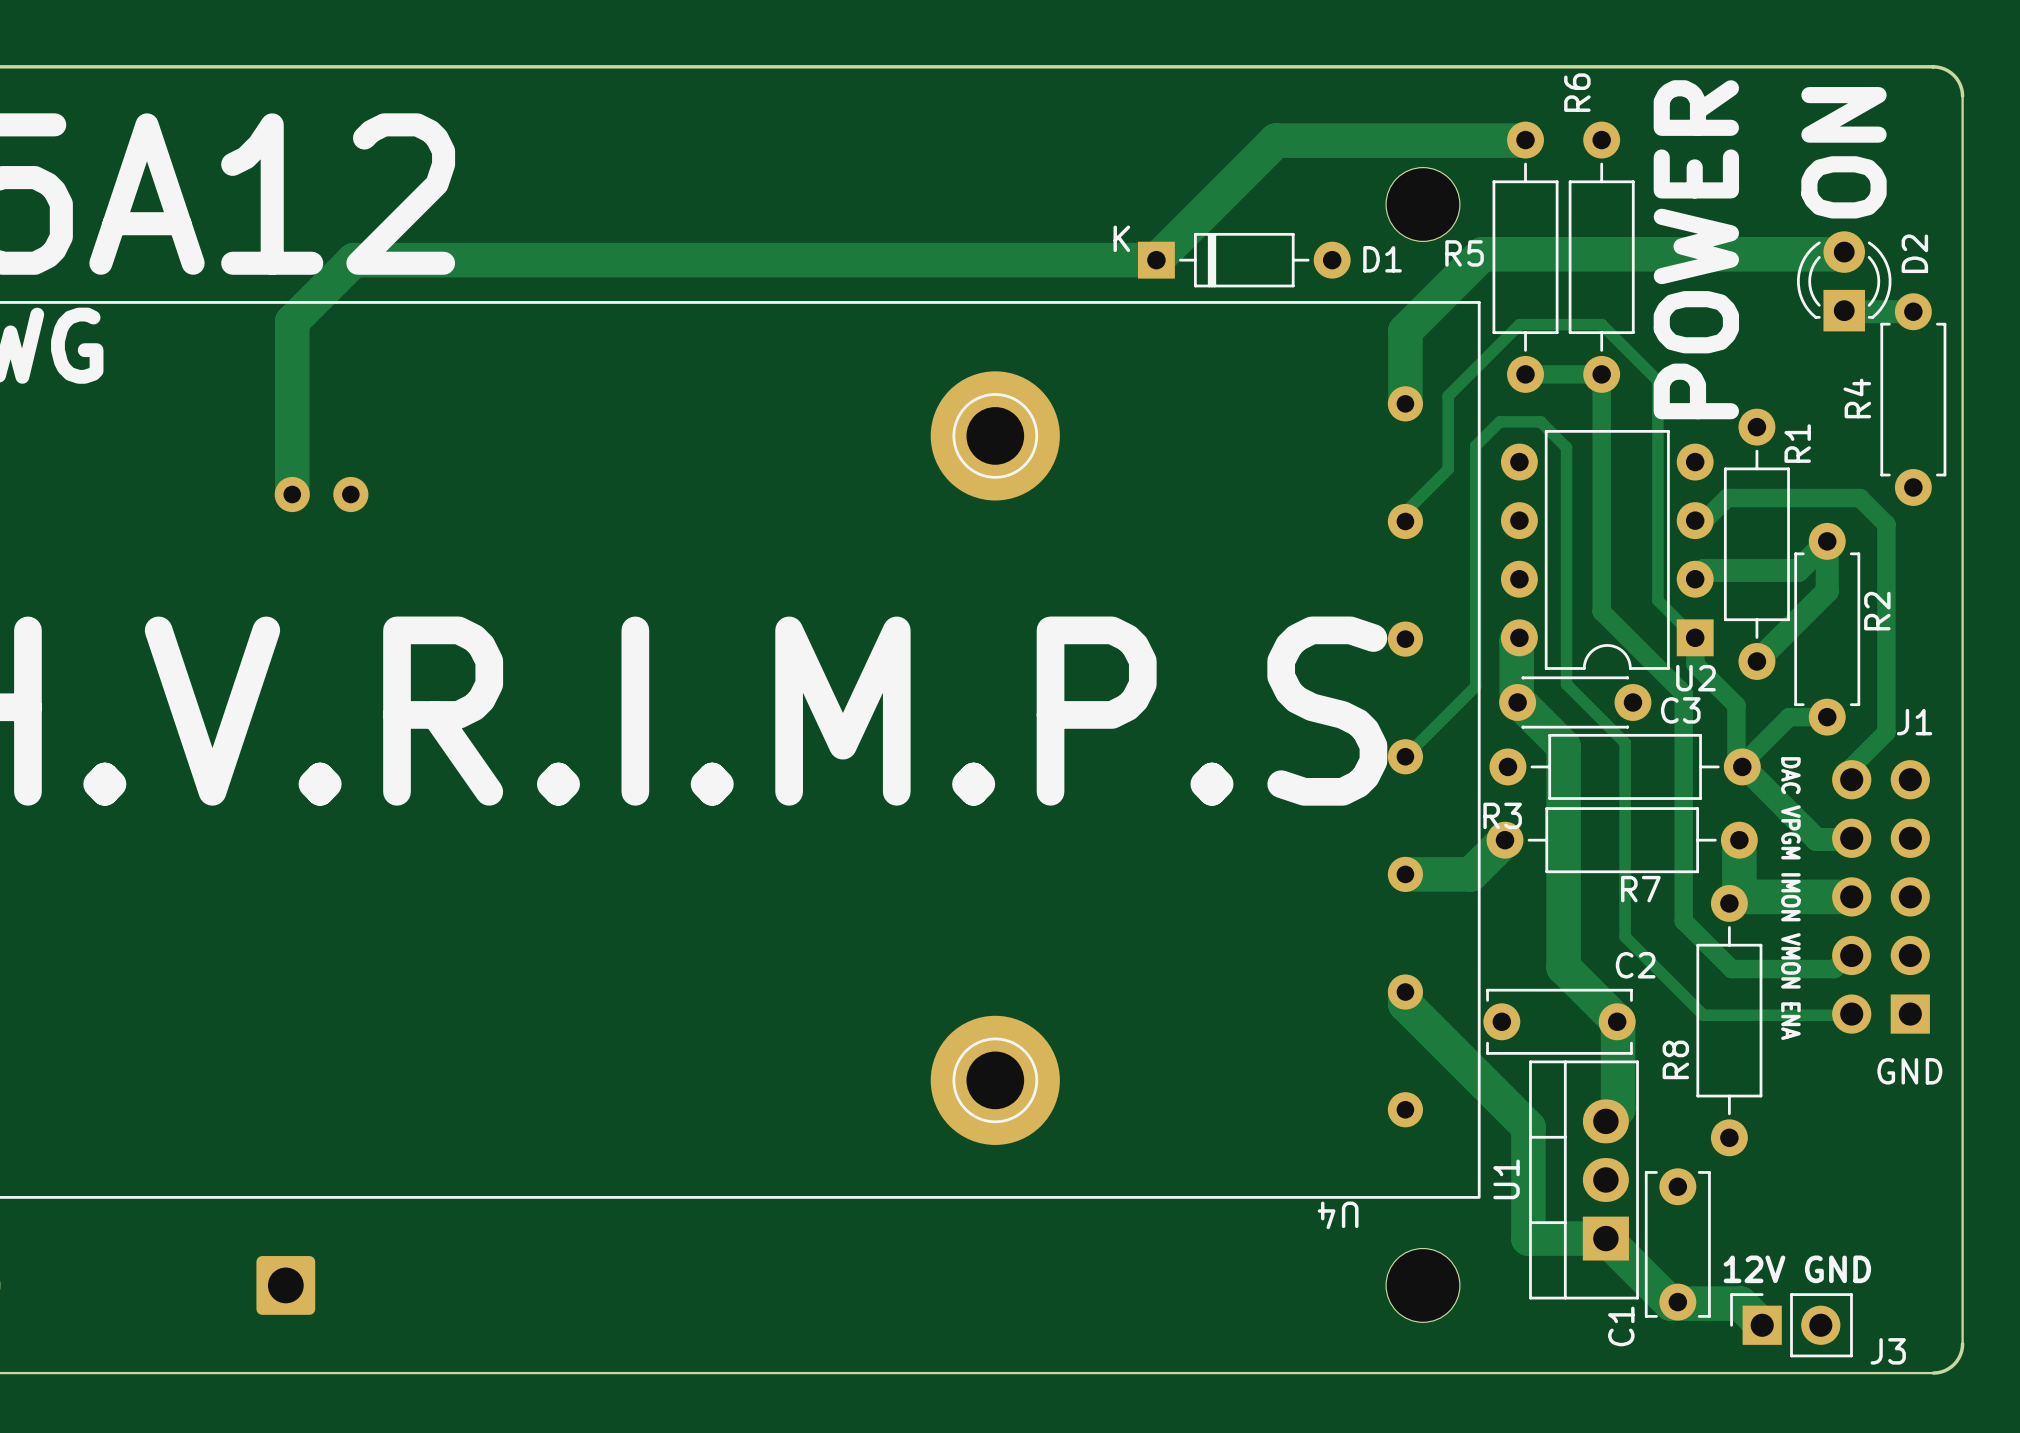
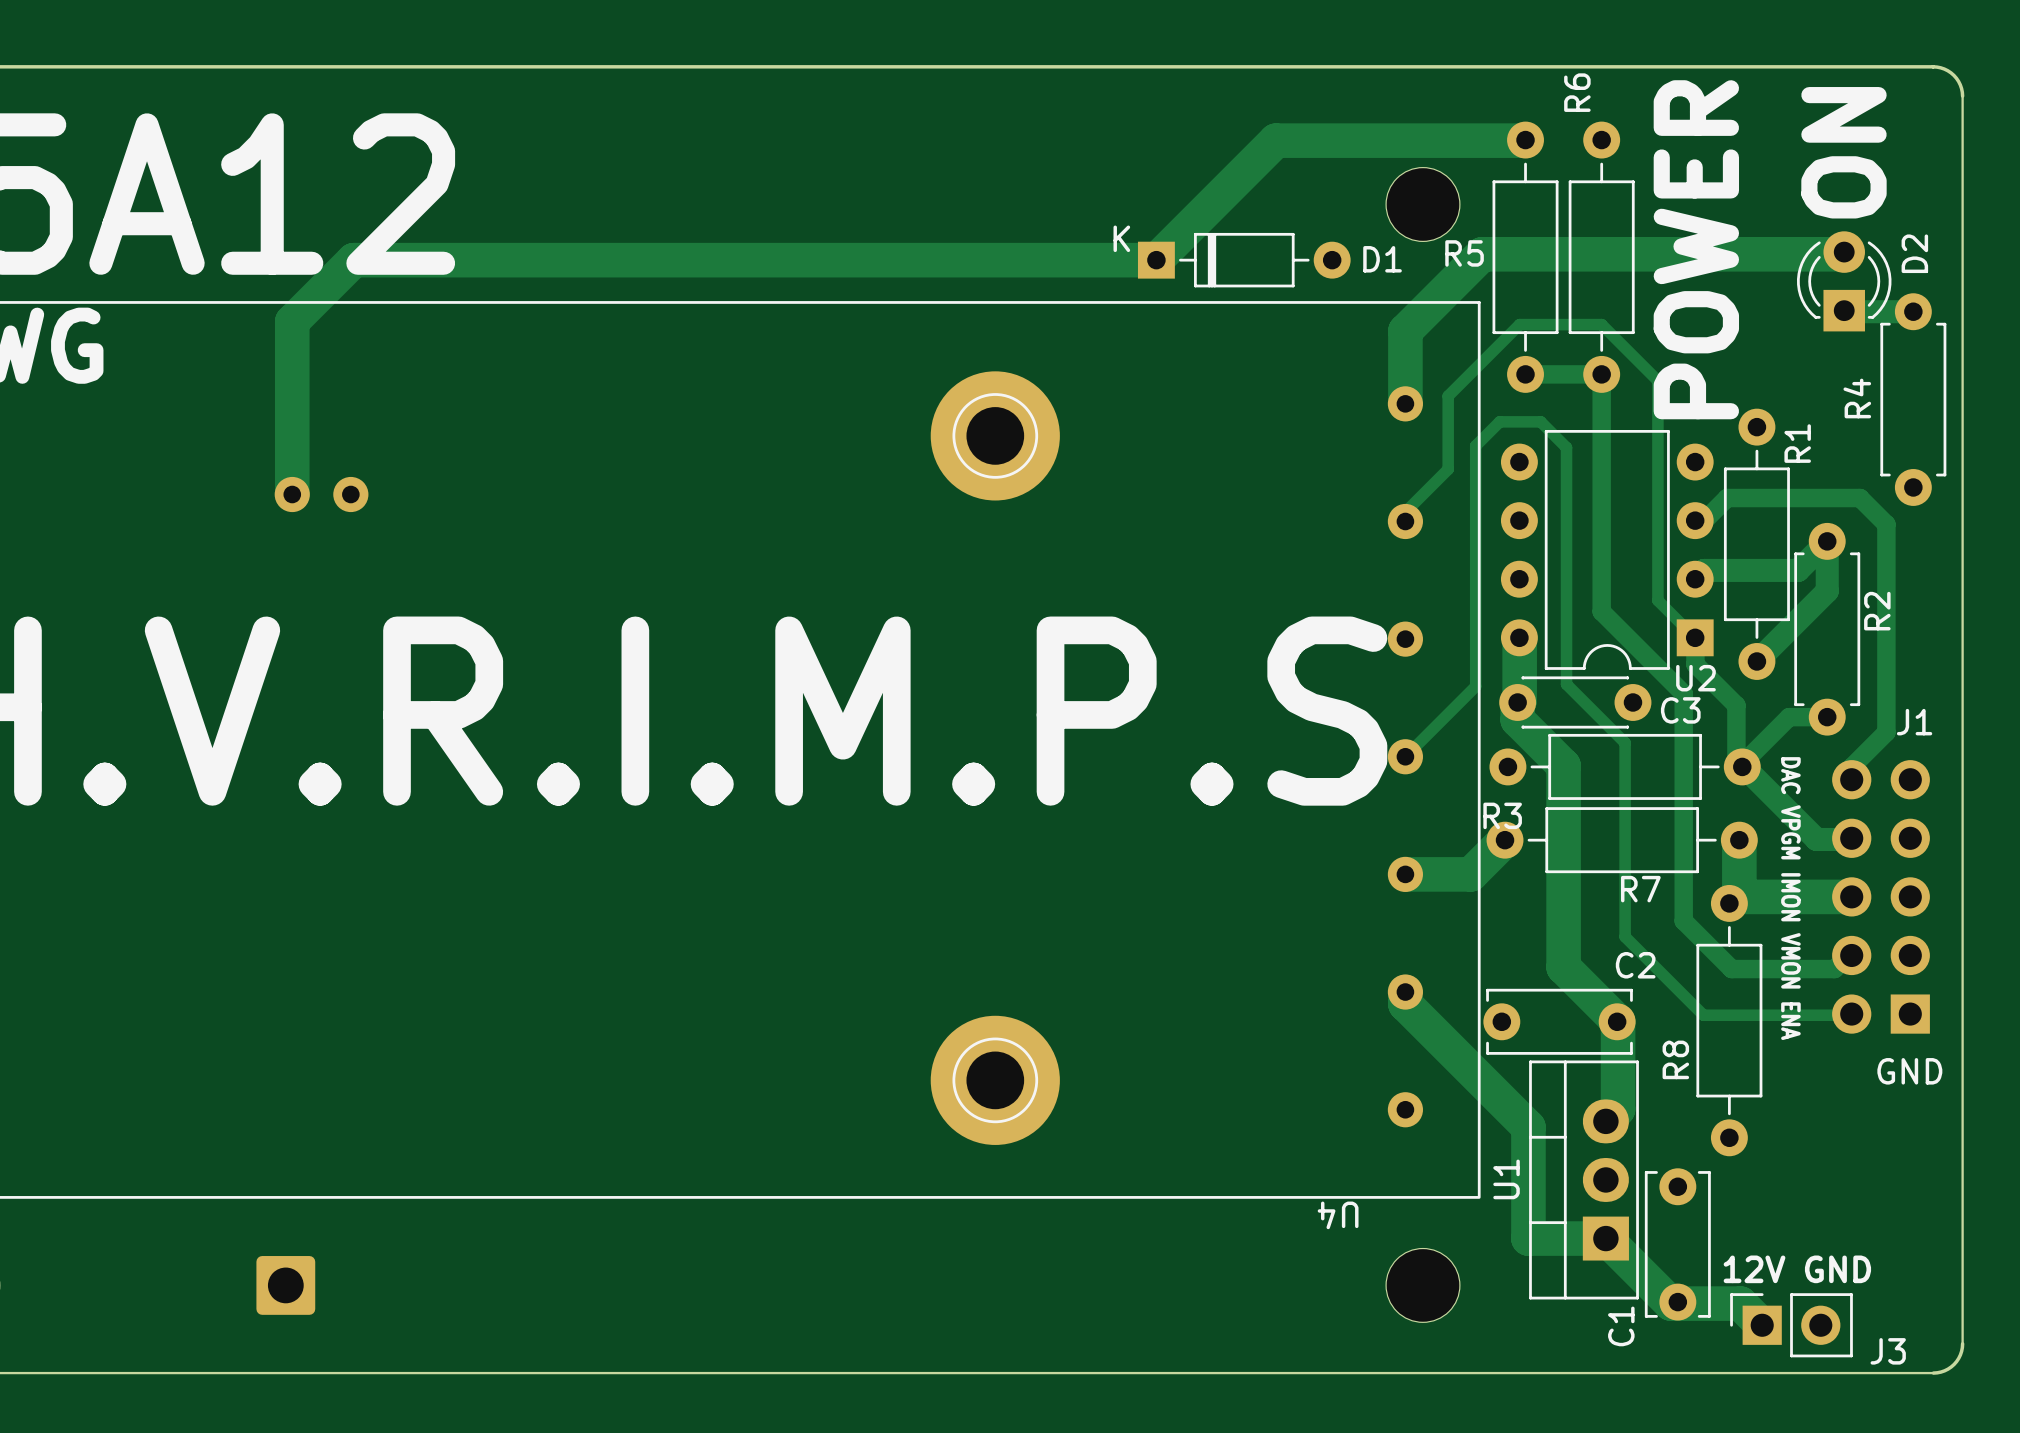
track: (1519, 637) (1516, 640) (1516, 701) (1563, 746) (1563, 765) -> (1519, 638) (1519, 700) (1517, 702) (1517, 719) (1563, 765)

